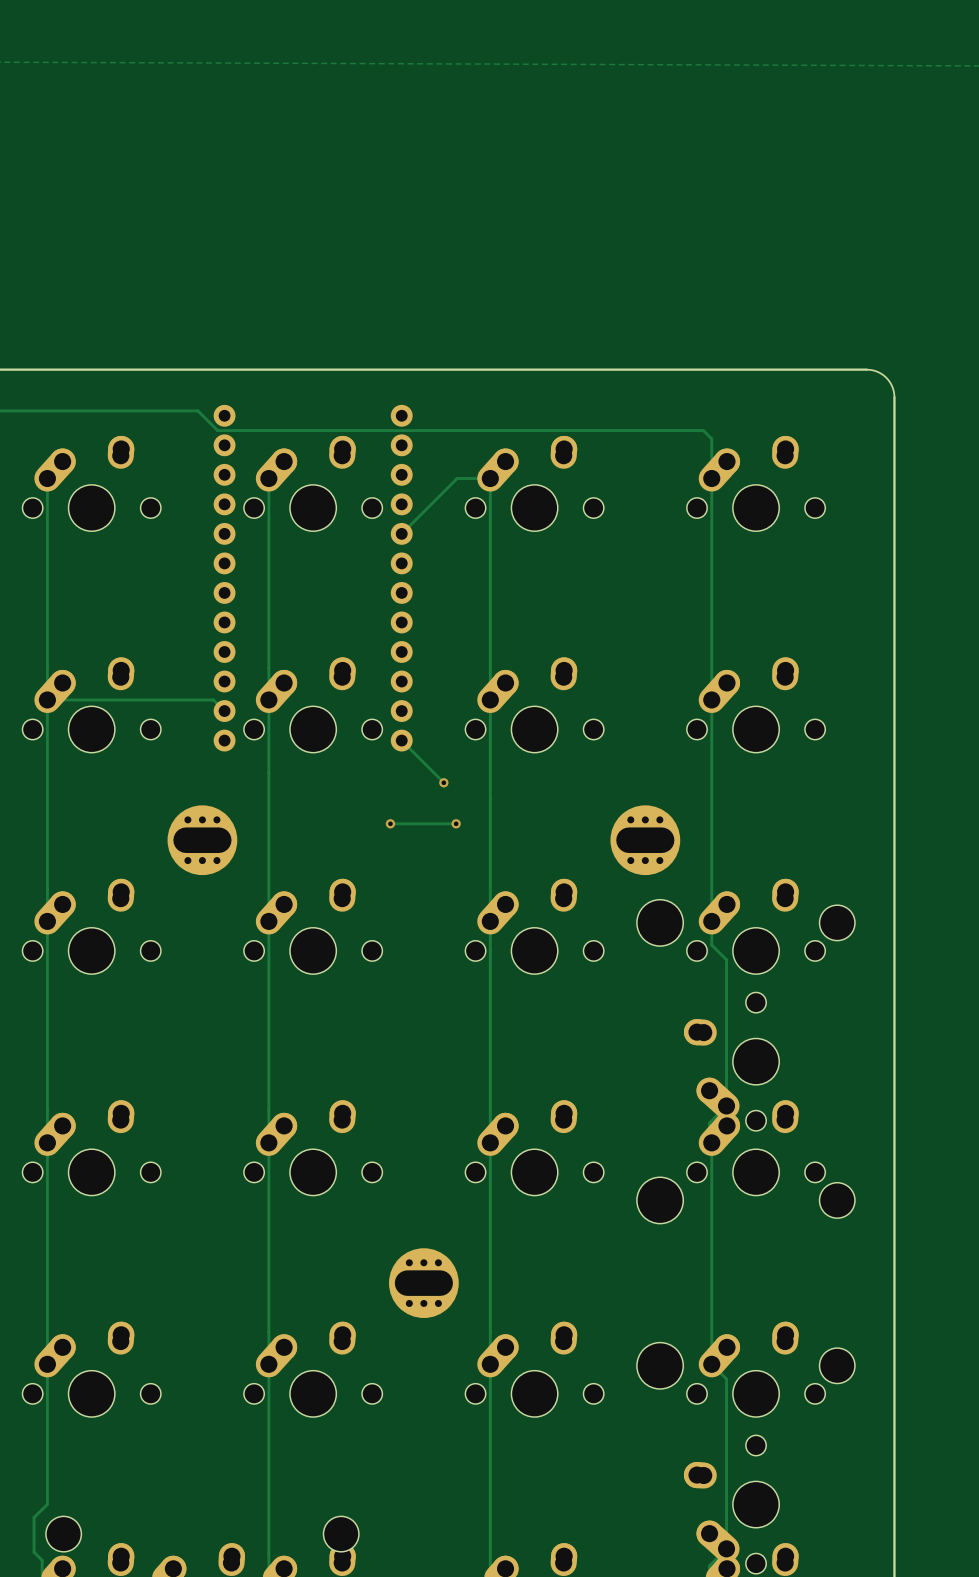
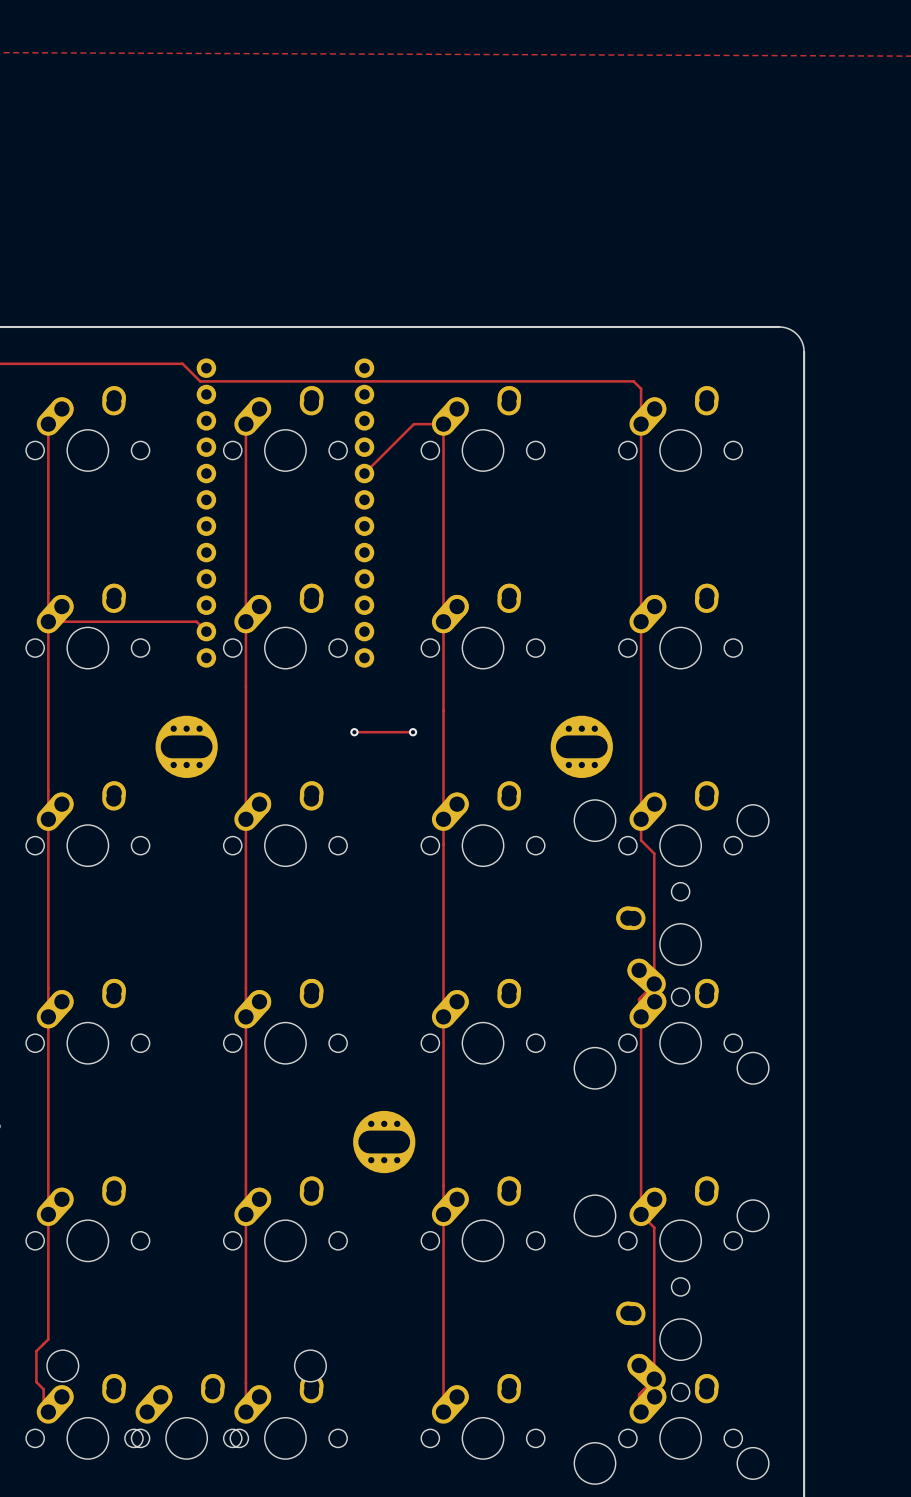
track: (401, 740) (443, 782) -> none
via: (443, 782) -> none

